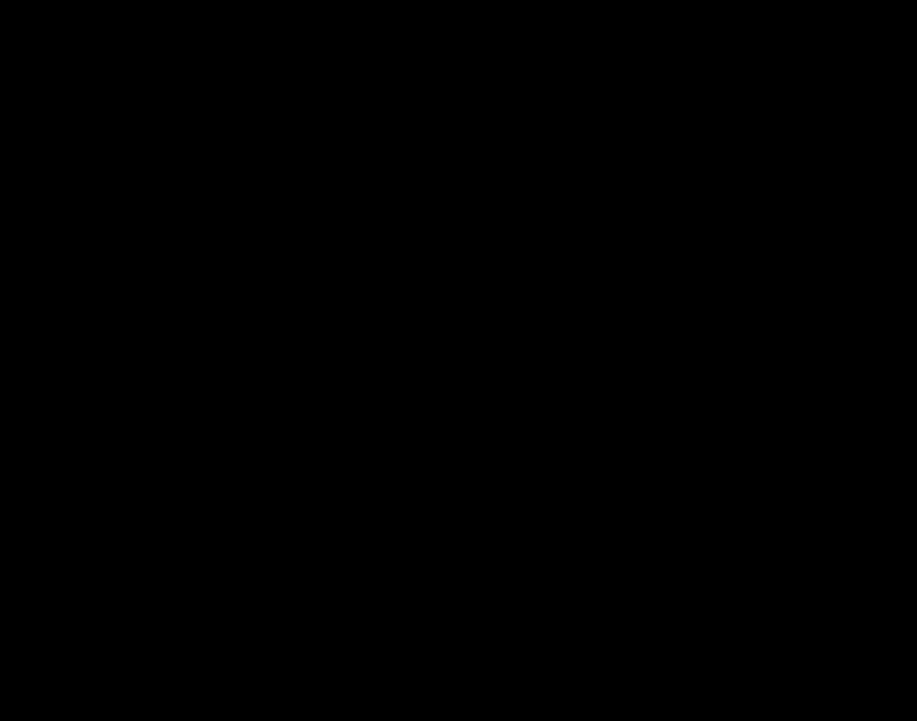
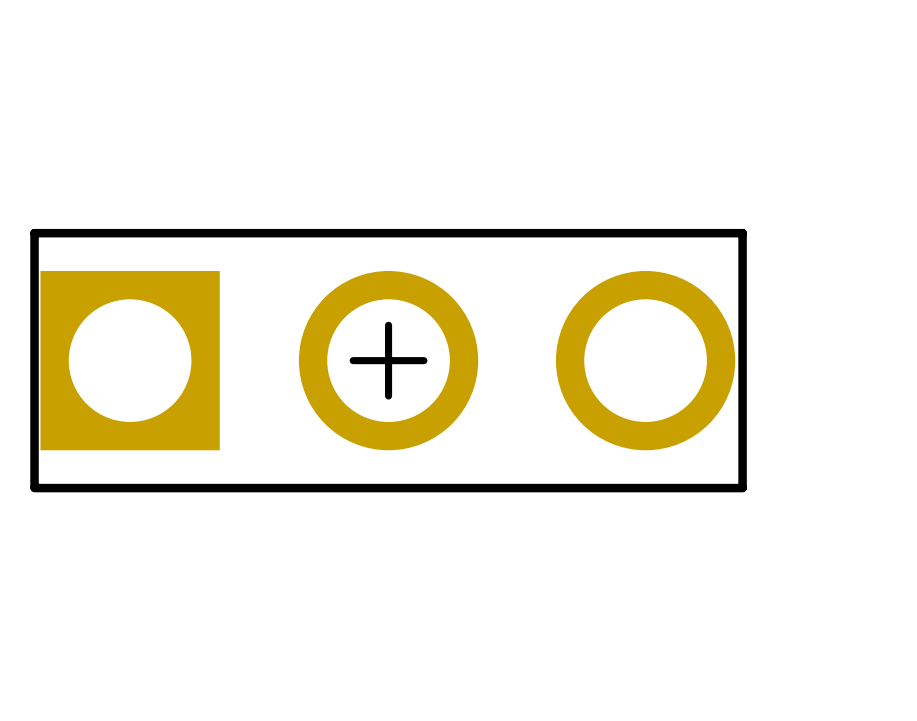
part: none -> (388, 360)

